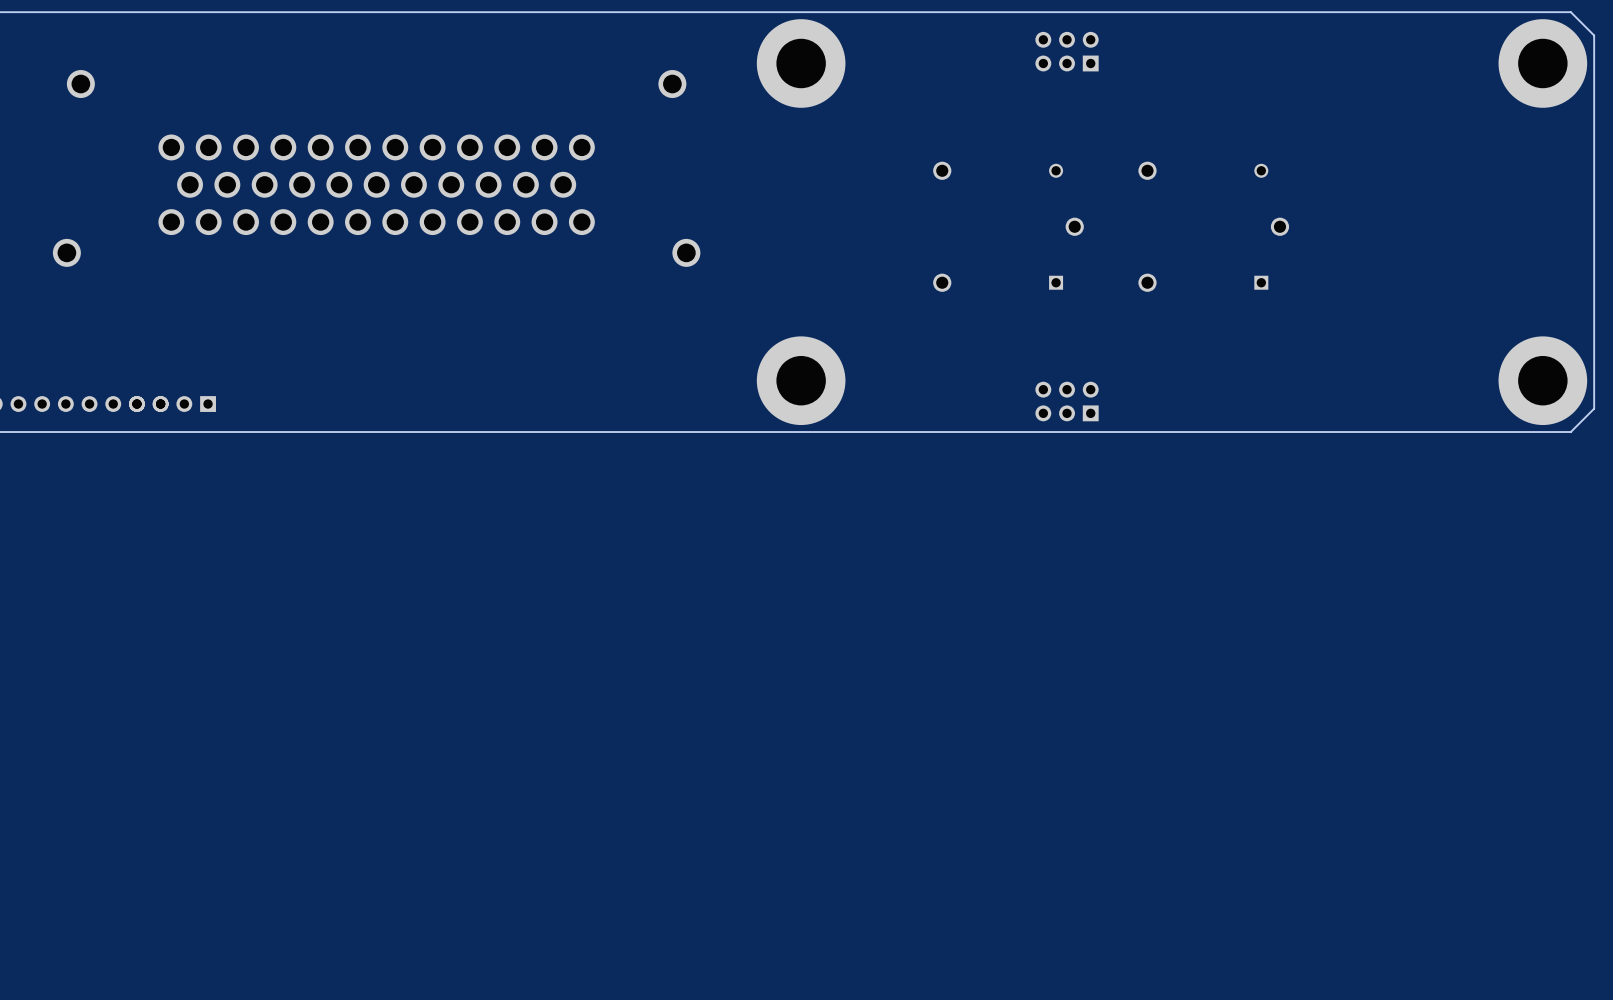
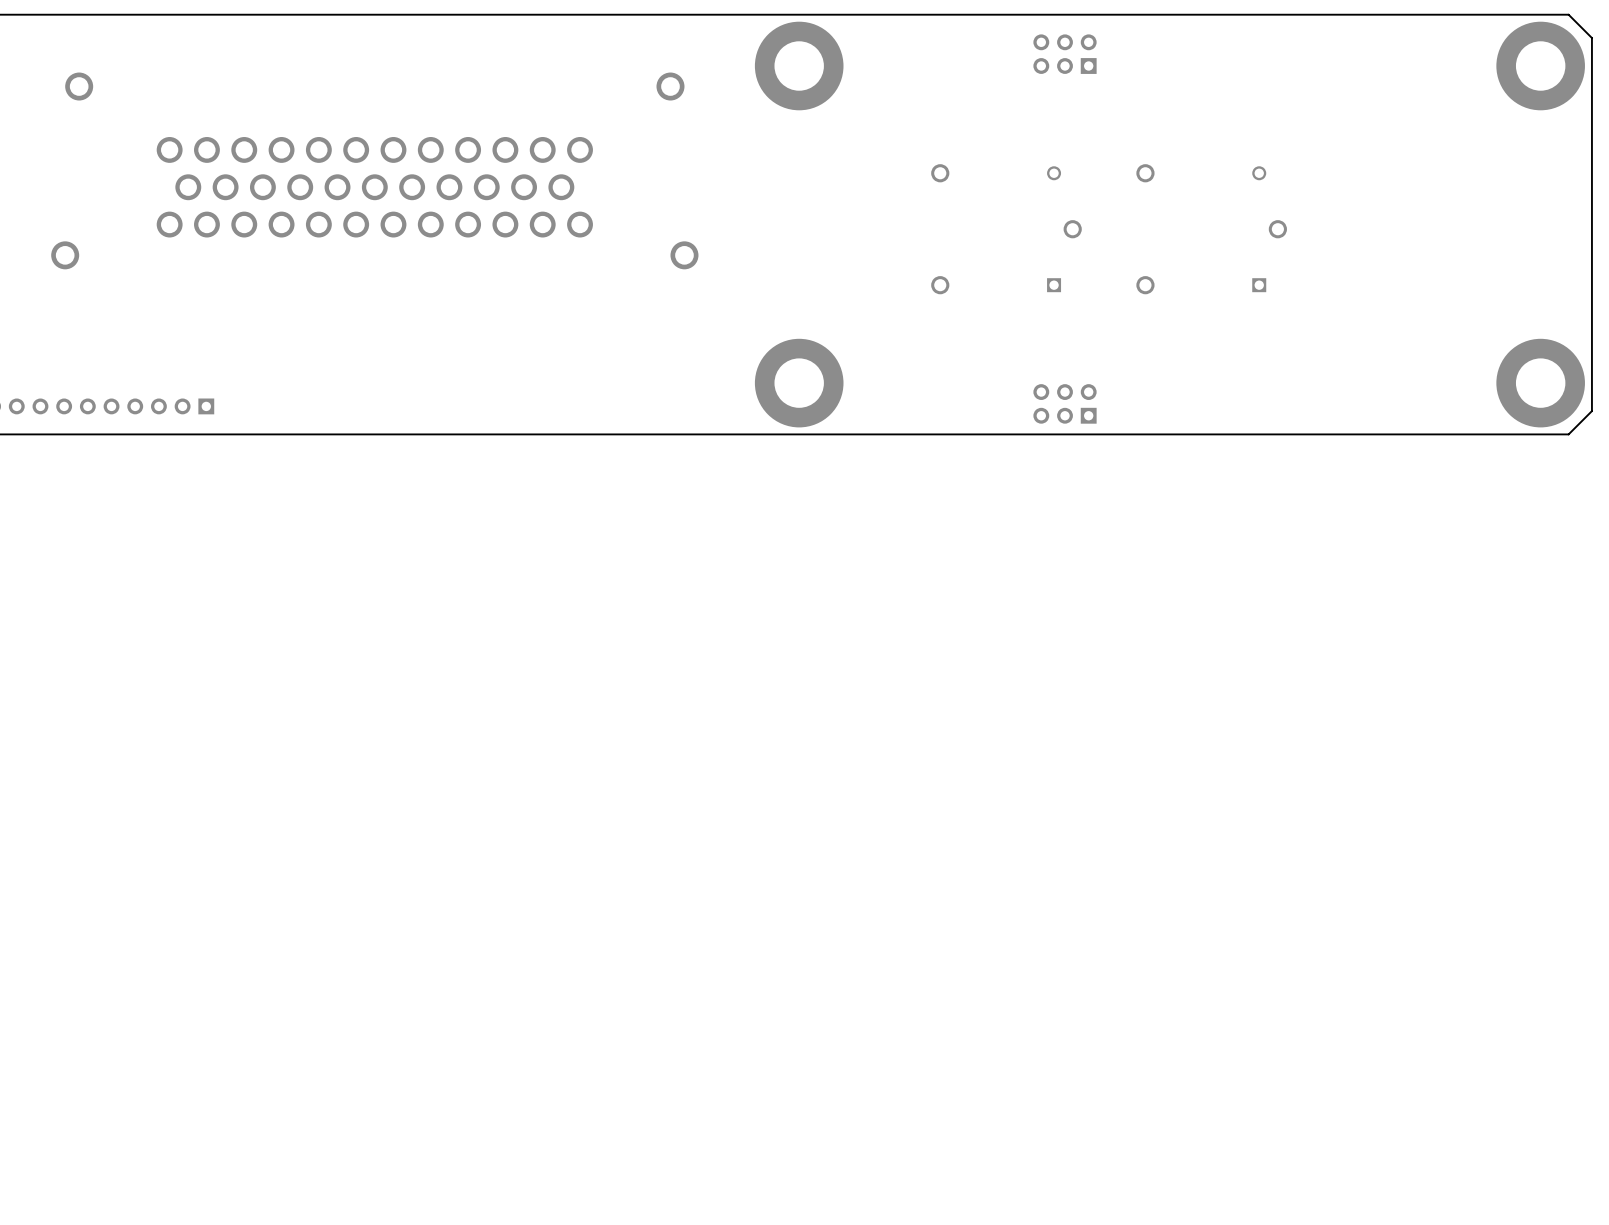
part: (136, 404) -> none
part: (160, 404) -> none

